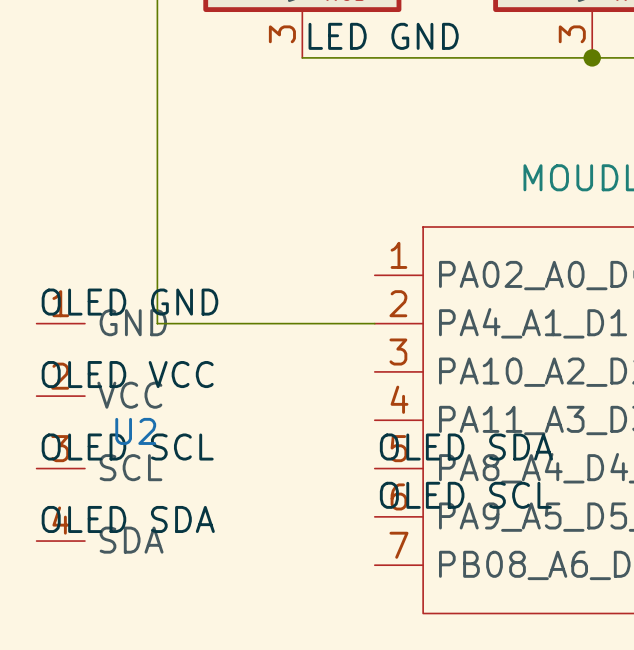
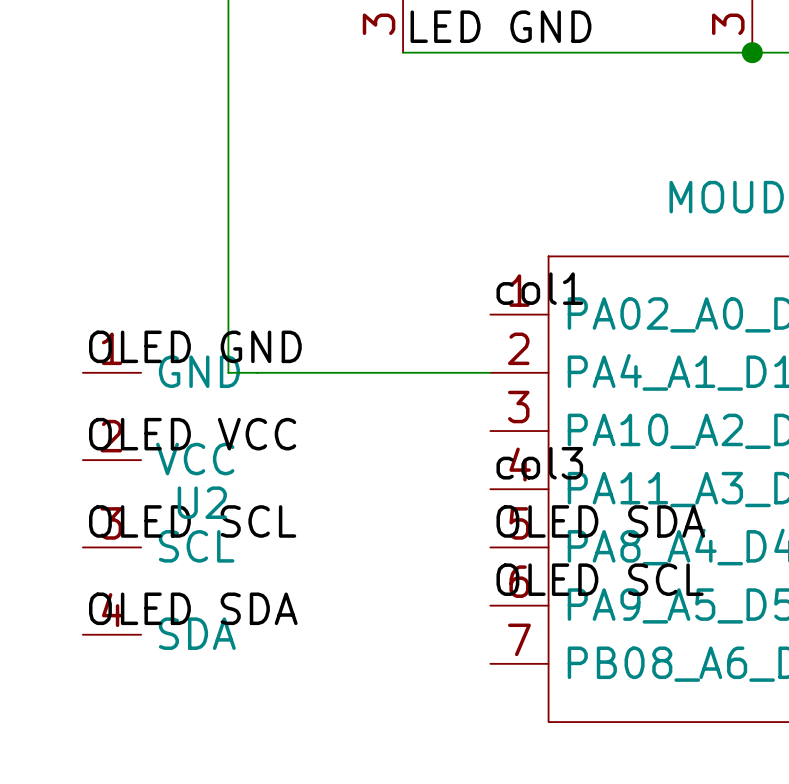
label: none -> col1 (539, 288)
label: none -> col3 (539, 463)

